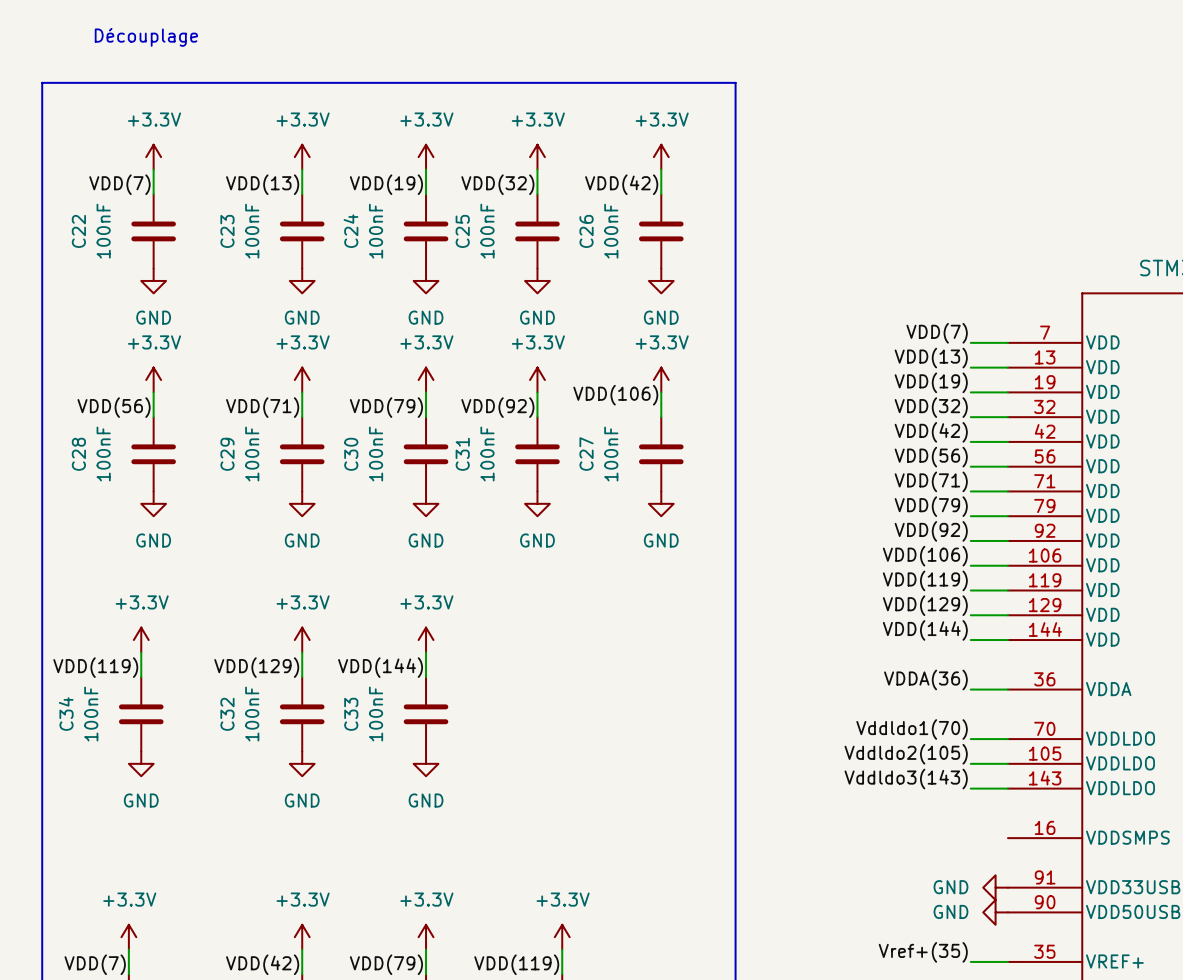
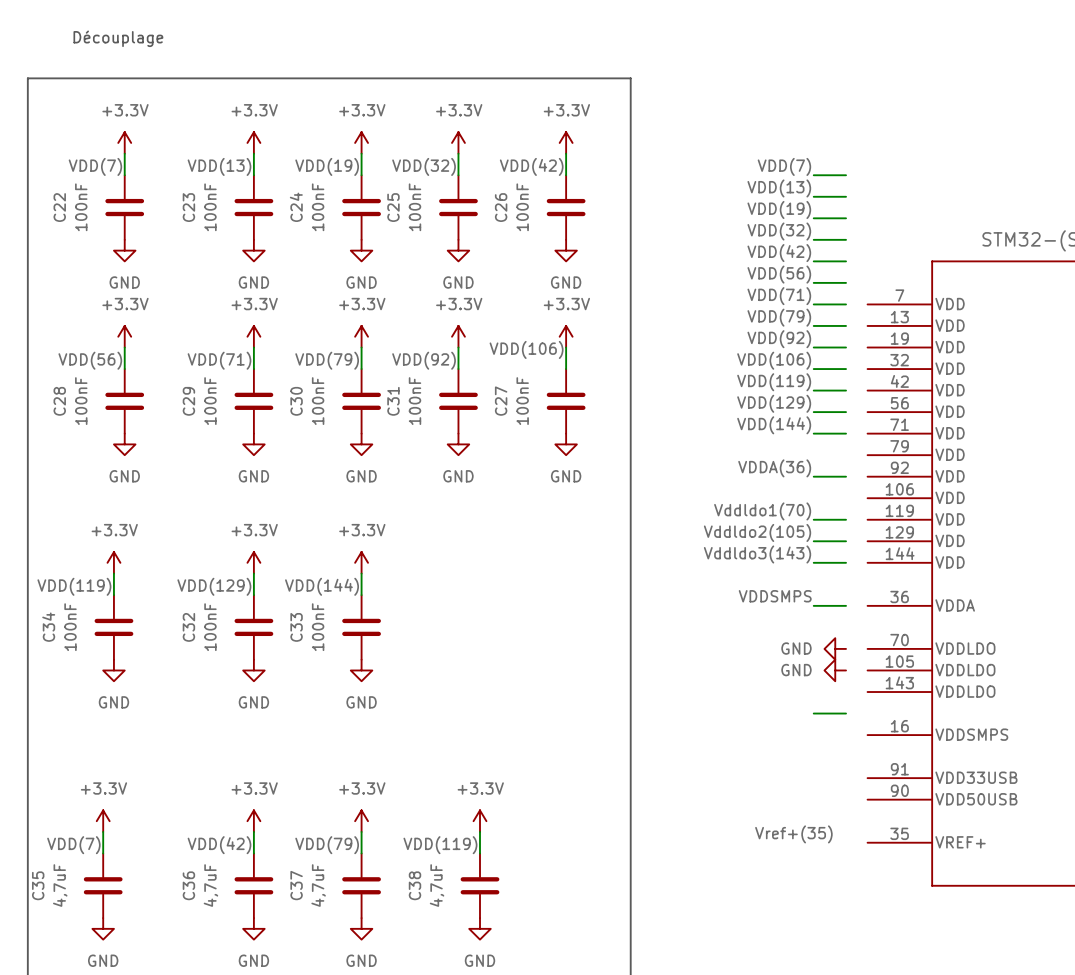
wire: none -> (813, 175) (846, 175)
wire: none -> (813, 196) (846, 196)
wire: none -> (813, 218) (846, 218)
wire: none -> (813, 239) (846, 239)
wire: none -> (813, 282) (846, 282)
label position: VDD(7) (937, 333) -> VDD(7) (784, 166)
wire: (983, 342) (1007, 342) -> (813, 304) (835, 304)
label position: VDD(13) (931, 358) -> VDD(13) (779, 188)
wire: (983, 367) (1007, 367) -> (813, 325) (835, 325)
label position: VDD(19) (931, 382) -> VDD(19) (779, 209)
wire: (983, 392) (1007, 392) -> (813, 347) (835, 347)
label position: VDD(32) (931, 407) -> VDD(32) (779, 231)
wire: (983, 417) (1007, 417) -> (813, 369) (835, 369)
label position: VDD(42) (931, 432) -> VDD(42) (779, 253)
wire: (983, 441) (1007, 441) -> (813, 390) (835, 390)
label position: VDD(56) (931, 457) -> VDD(56) (779, 274)
wire: (983, 466) (1007, 466) -> (813, 412) (835, 412)
label position: VDD(71) (931, 481) -> VDD(71) (779, 296)
wire: (983, 491) (1007, 491) -> (813, 433) (835, 433)
label position: VDD(79) (931, 506) -> VDD(79) (779, 317)
wire: (970, 516) (1007, 516) -> (813, 261) (846, 261)
label position: VDD(92) (931, 531) -> VDD(92) (779, 339)
wire: (983, 540) (1007, 540) -> (813, 476) (835, 476)
label position: VDD(106) (925, 556) -> VDD(106) (774, 360)
wire: (970, 565) (1007, 565) -> none
label position: VDD(119) (925, 580) -> VDD(119) (774, 382)
wire: (983, 590) (1007, 590) -> (813, 519) (835, 519)
label position: VDD(129) (925, 605) -> VDD(129) (774, 403)
wire: (983, 615) (1007, 615) -> (813, 541) (835, 541)
label position: VDD(144) (925, 630) -> VDD(144) (774, 425)
wire: (983, 640) (1007, 640) -> (813, 562) (835, 562)
label: none -> VDDSMPS (775, 596)
label position: VDDA(36) (925, 679) -> VDDA(36) (774, 468)
wire: (983, 689) (1007, 689) -> (813, 605) (835, 605)
label position: Vddldo1(70) (912, 729) -> Vddldo1(70) (762, 511)
wire: (970, 739) (1007, 739) -> none
power symbol: none -> GND (835, 648)
label position: Vddldo2(105) (906, 754) -> Vddldo2(105) (757, 532)
wire: (970, 763) (1007, 763) -> none
power symbol: none -> GND (835, 670)
label position: Vddldo3(143) (906, 779) -> Vddldo3(143) (757, 554)
wire: (970, 788) (1007, 788) -> none
power symbol: GND (995, 887) -> none
power symbol: GND (995, 912) -> none
wire: (970, 961) (1007, 961) -> (813, 713) (846, 713)

